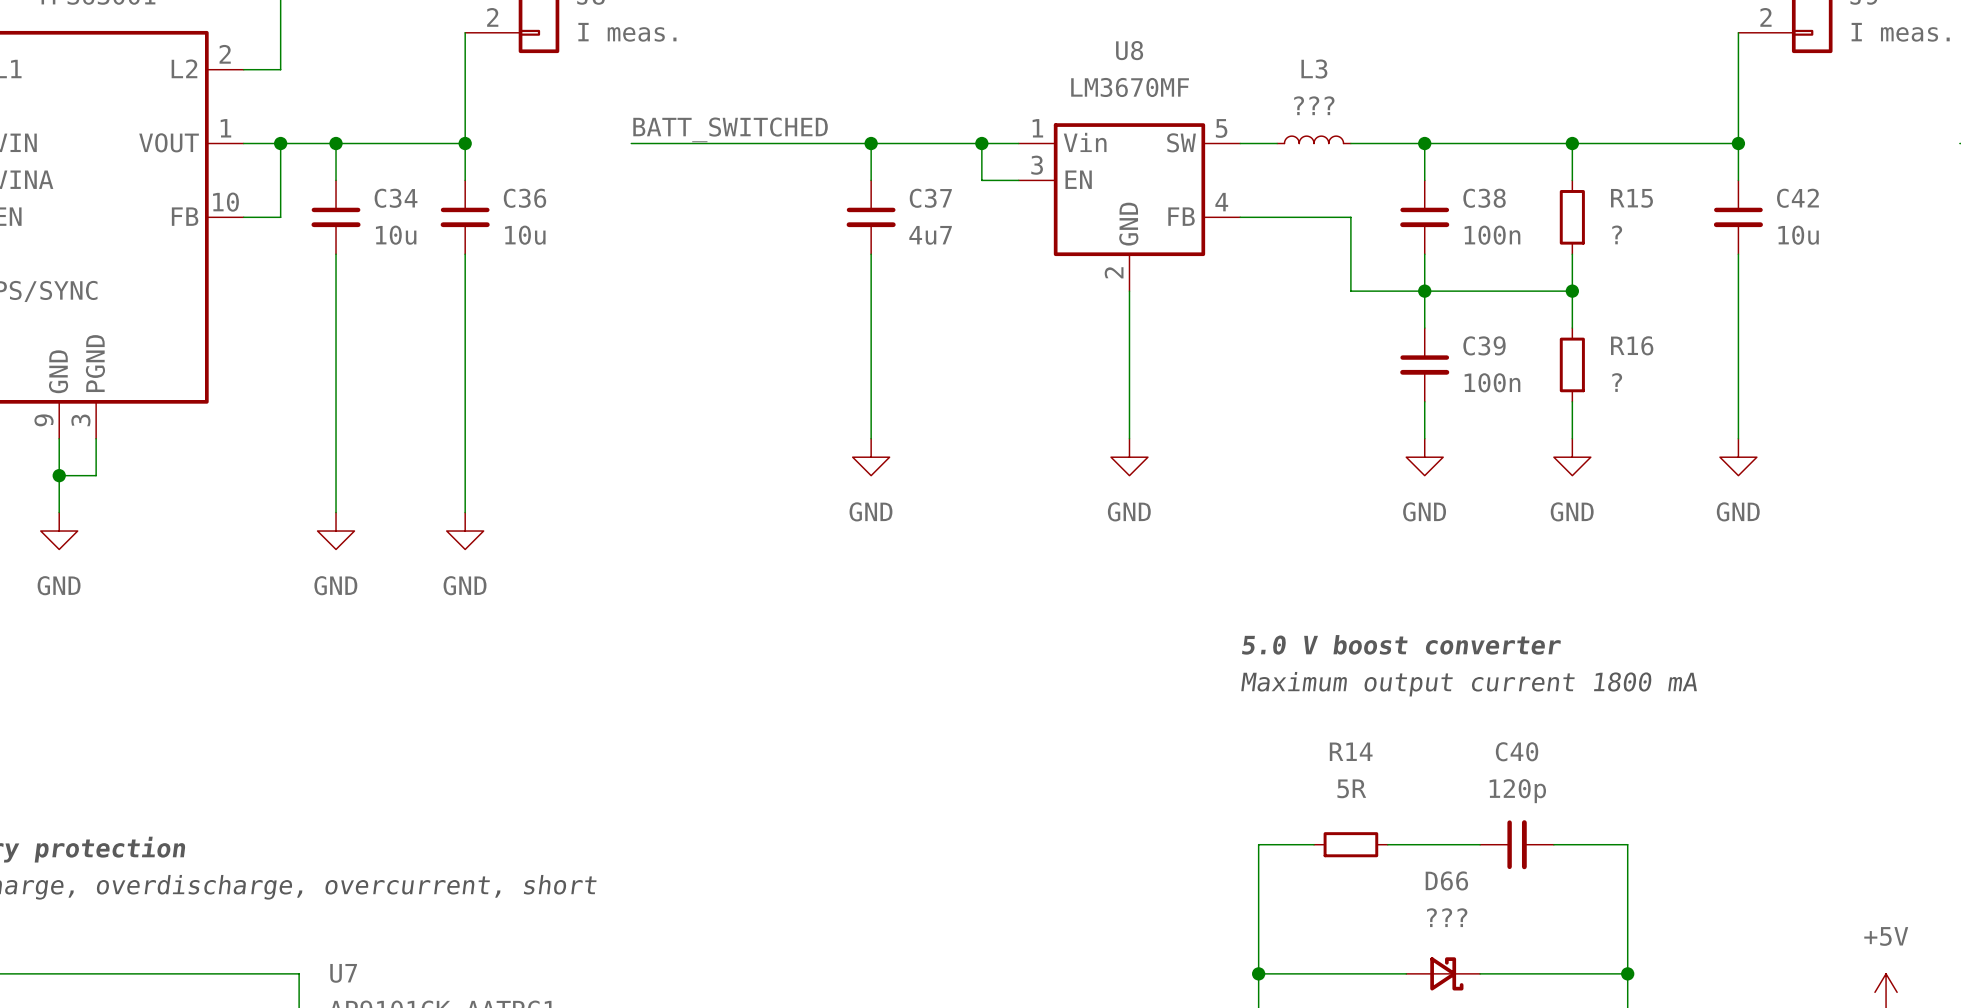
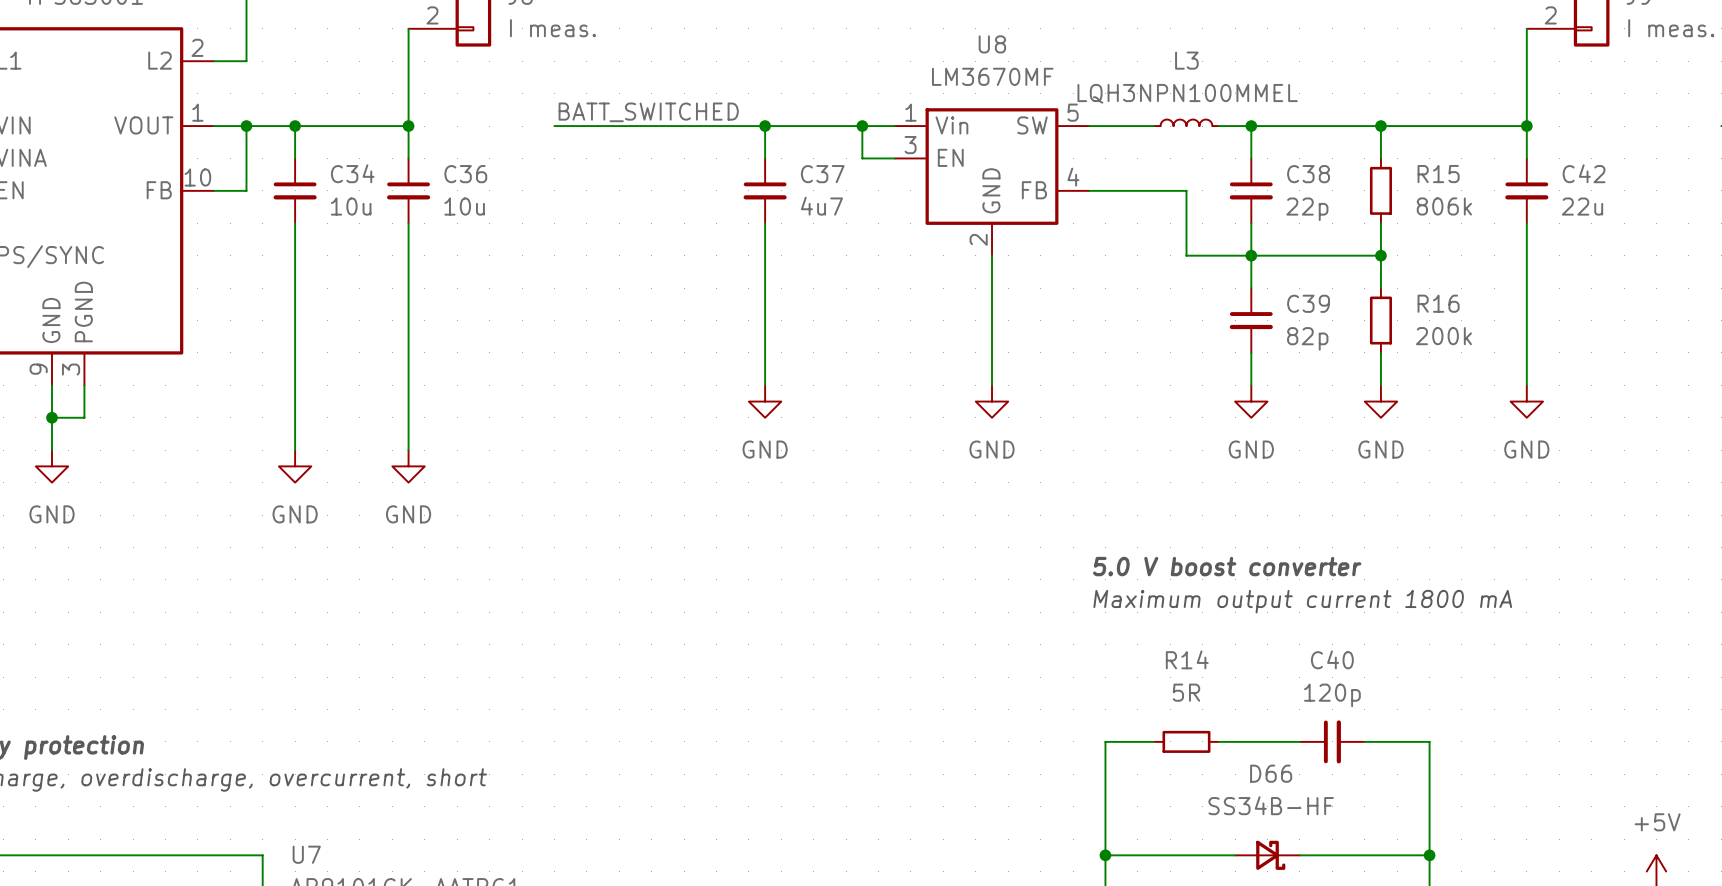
L3 value: ??? (1314, 105) -> LQH3NPN100MMEL (1187, 93)
L3 position: (1314, 139) -> (1186, 122)
wire: (1350, 143) (1387, 143) -> (1121, 126) (1154, 126)
R15 value: ? (1617, 234) -> 806k (1444, 206)
C38 value: 100n (1492, 235) -> 22p (1307, 209)
C42 value: 10u (1798, 235) -> 22u (1582, 206)
C39 value: 100n (1492, 382) -> 82p (1307, 338)
R16 value: ? (1617, 382) -> 200k (1443, 336)
D66 value: ??? (1447, 917) -> SS34B-HF (1271, 805)

